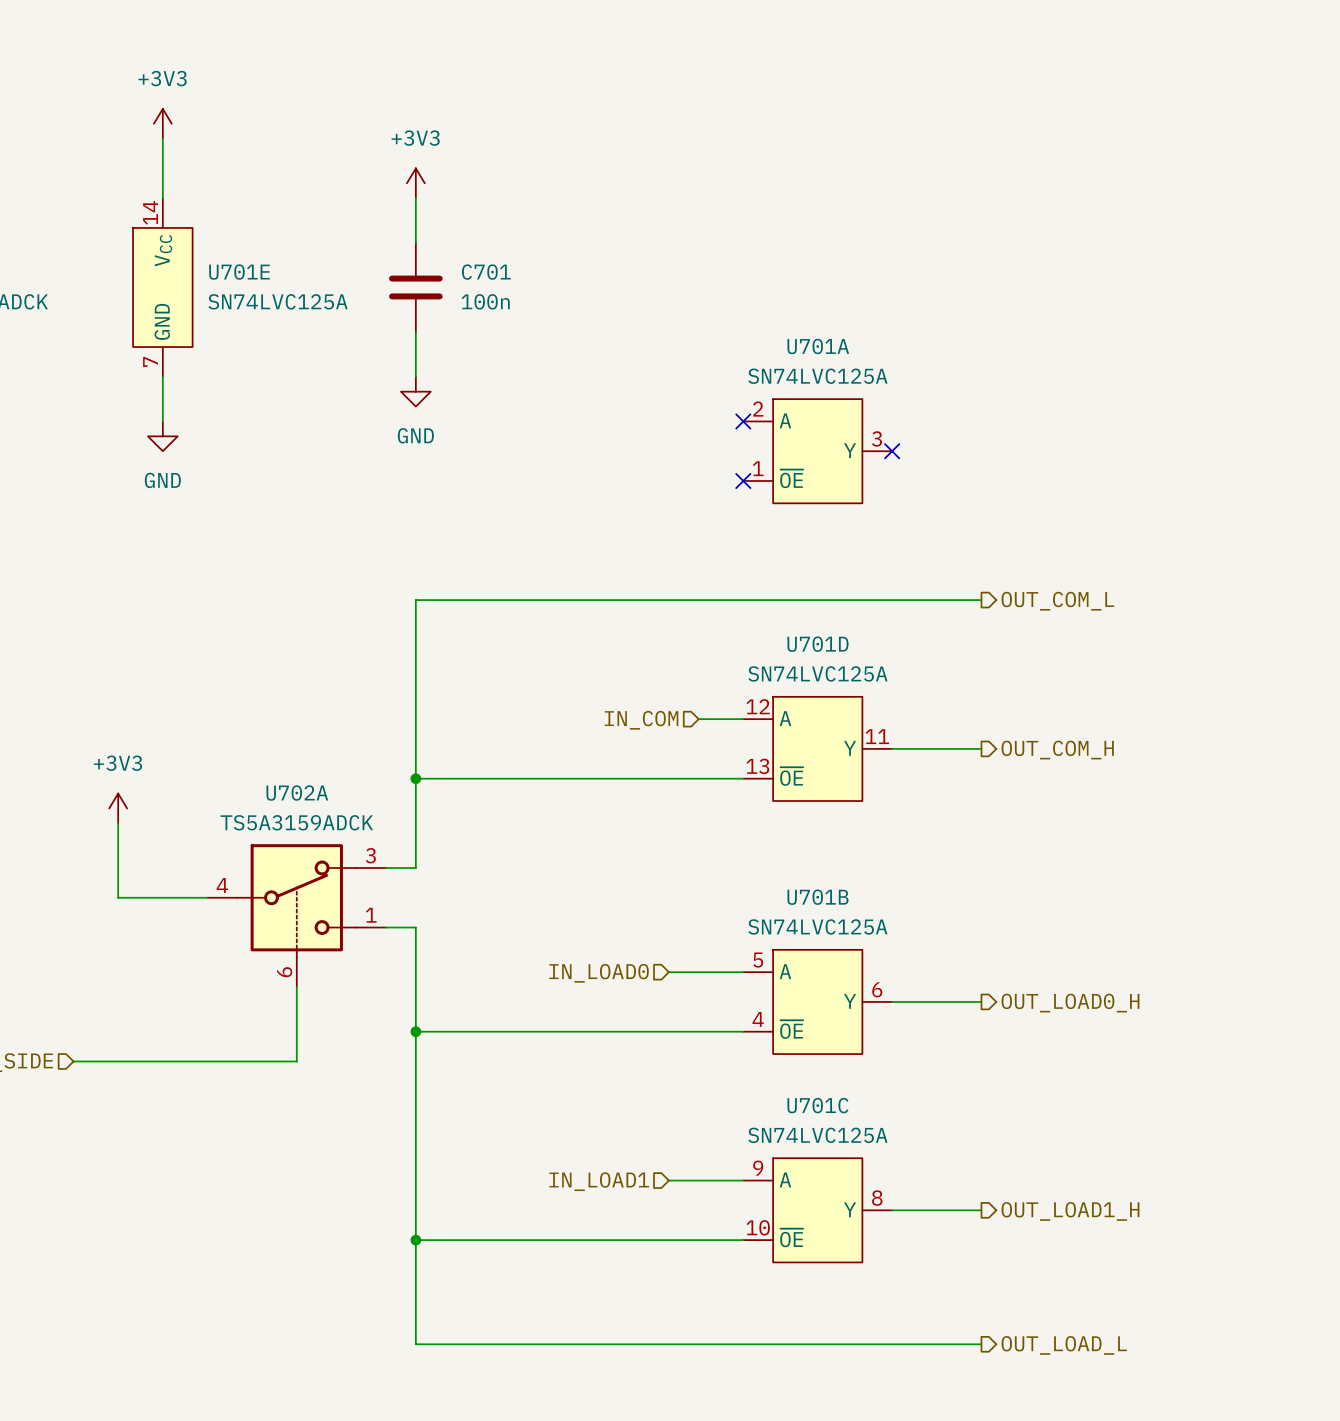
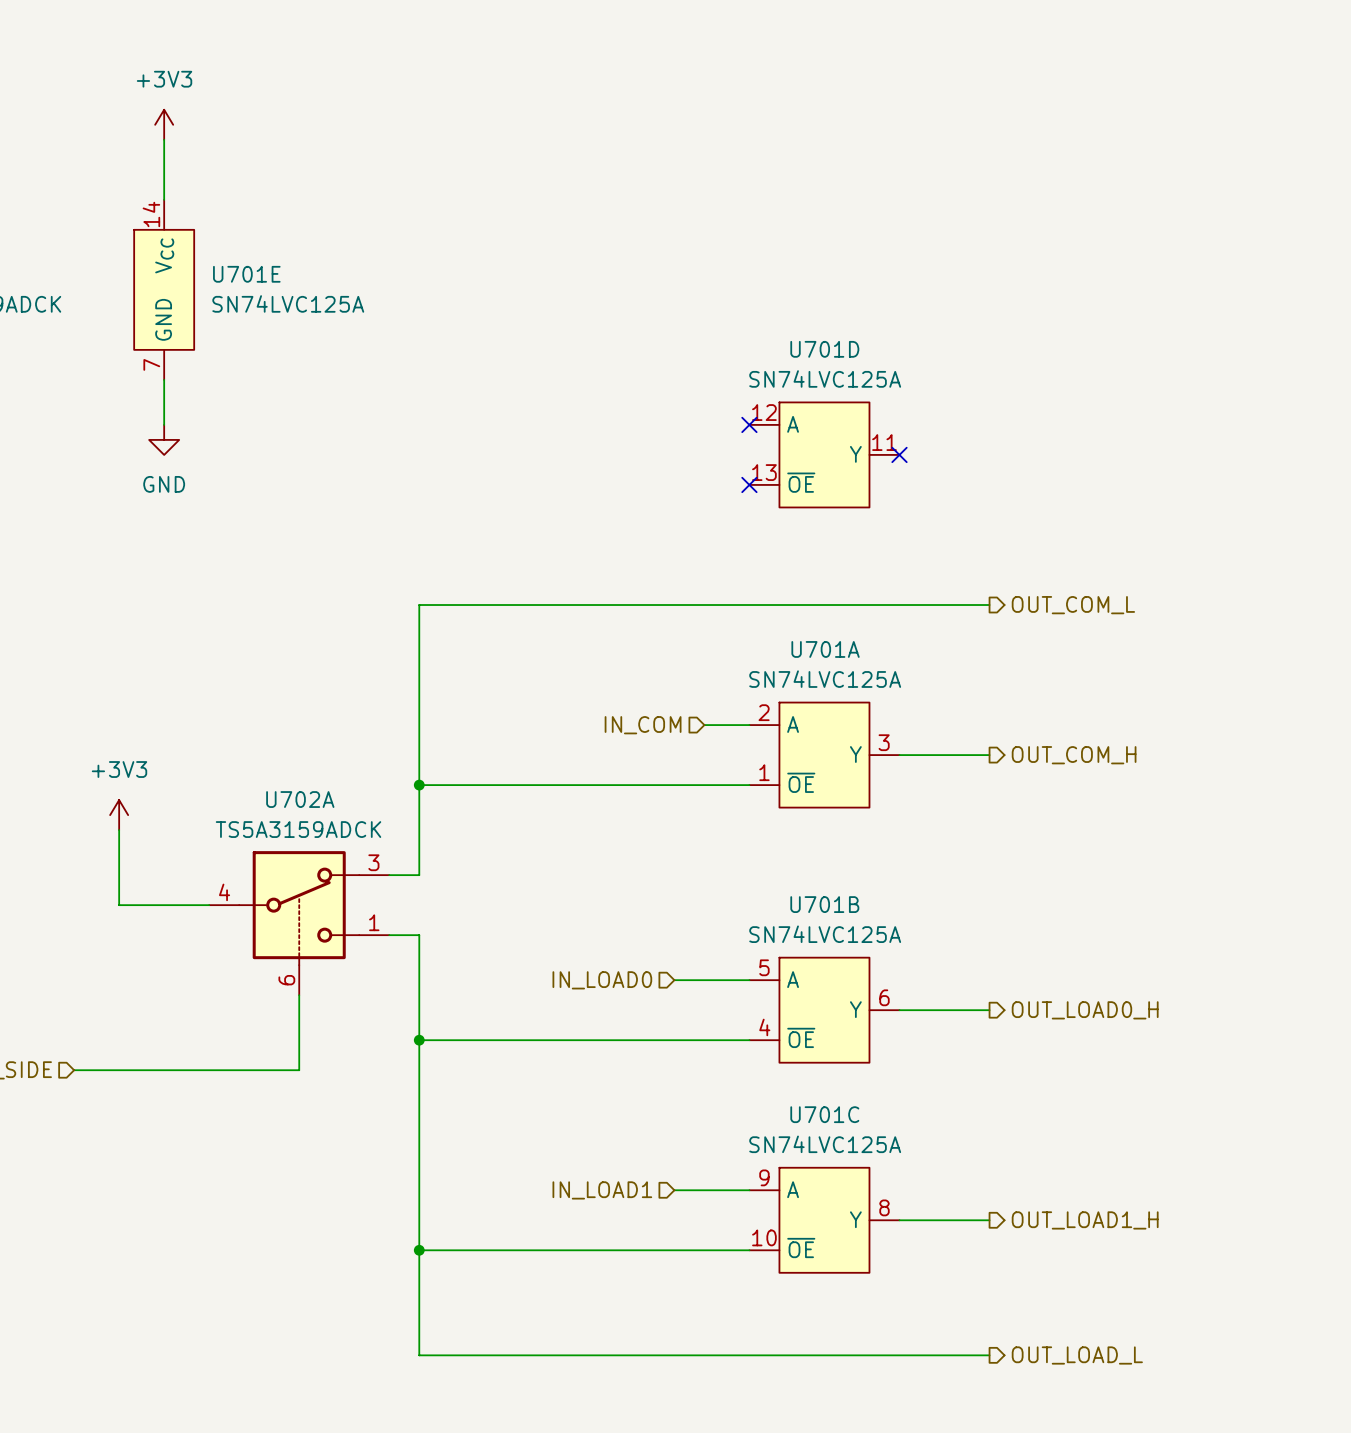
power symbol: +3V3 (415, 183) -> none
wire: (415, 198) (415, 242) -> none
C701: 100n (415, 287) -> none
wire: (415, 332) (415, 376) -> none
power symbol: GND (415, 391) -> none
U701A position: (817, 451) -> (824, 755)
U701D position: (817, 748) -> (824, 454)

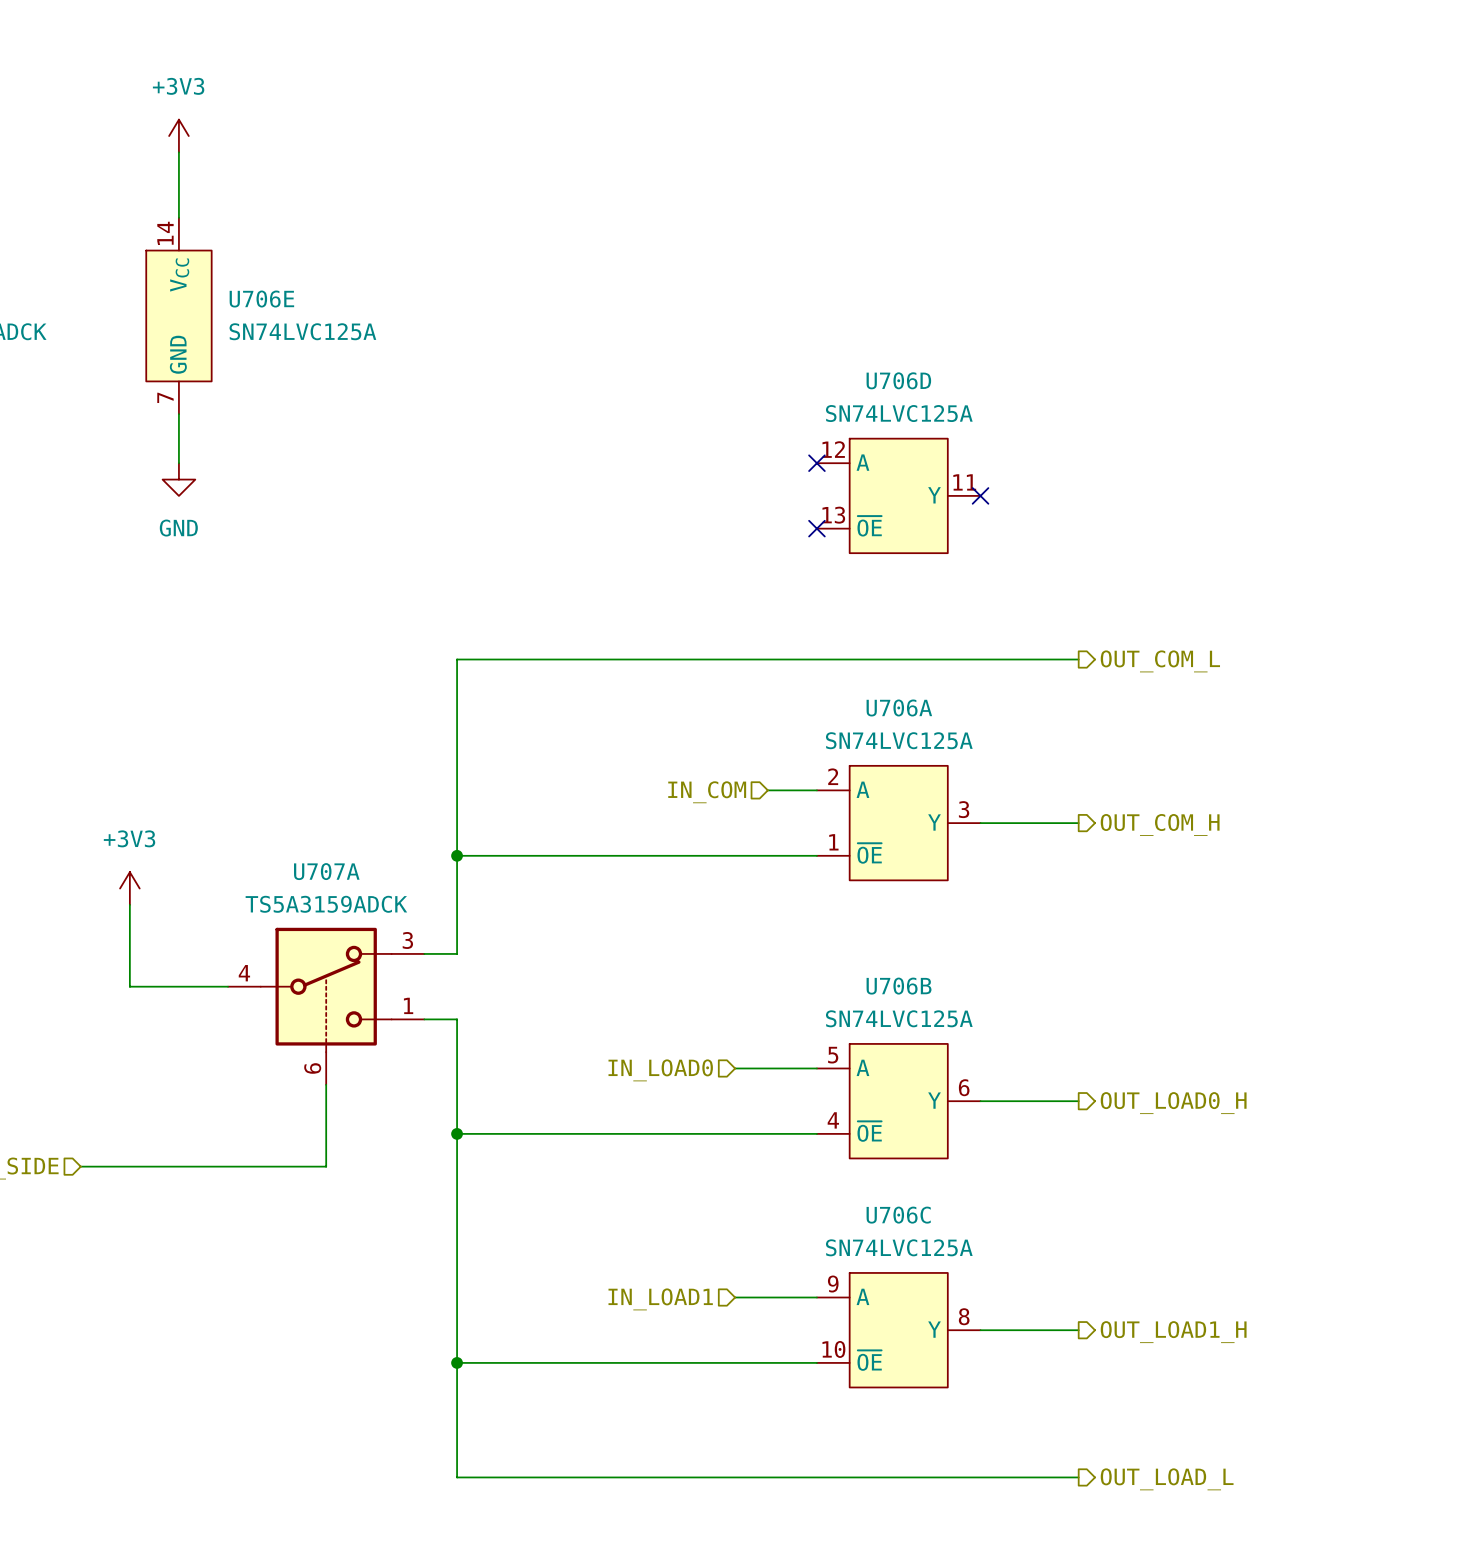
U701E name: U701E (246, 274) -> U706E (261, 299)
U701D name: U701D (824, 349) -> U706D (898, 380)
U701A name: U701A (825, 649) -> U706A (899, 707)
U702A name: U702A (300, 799) -> U707A (326, 871)
U701B name: U701B (824, 904) -> U706B (899, 986)
U701C name: U701C (824, 1114) -> U706C (898, 1215)

